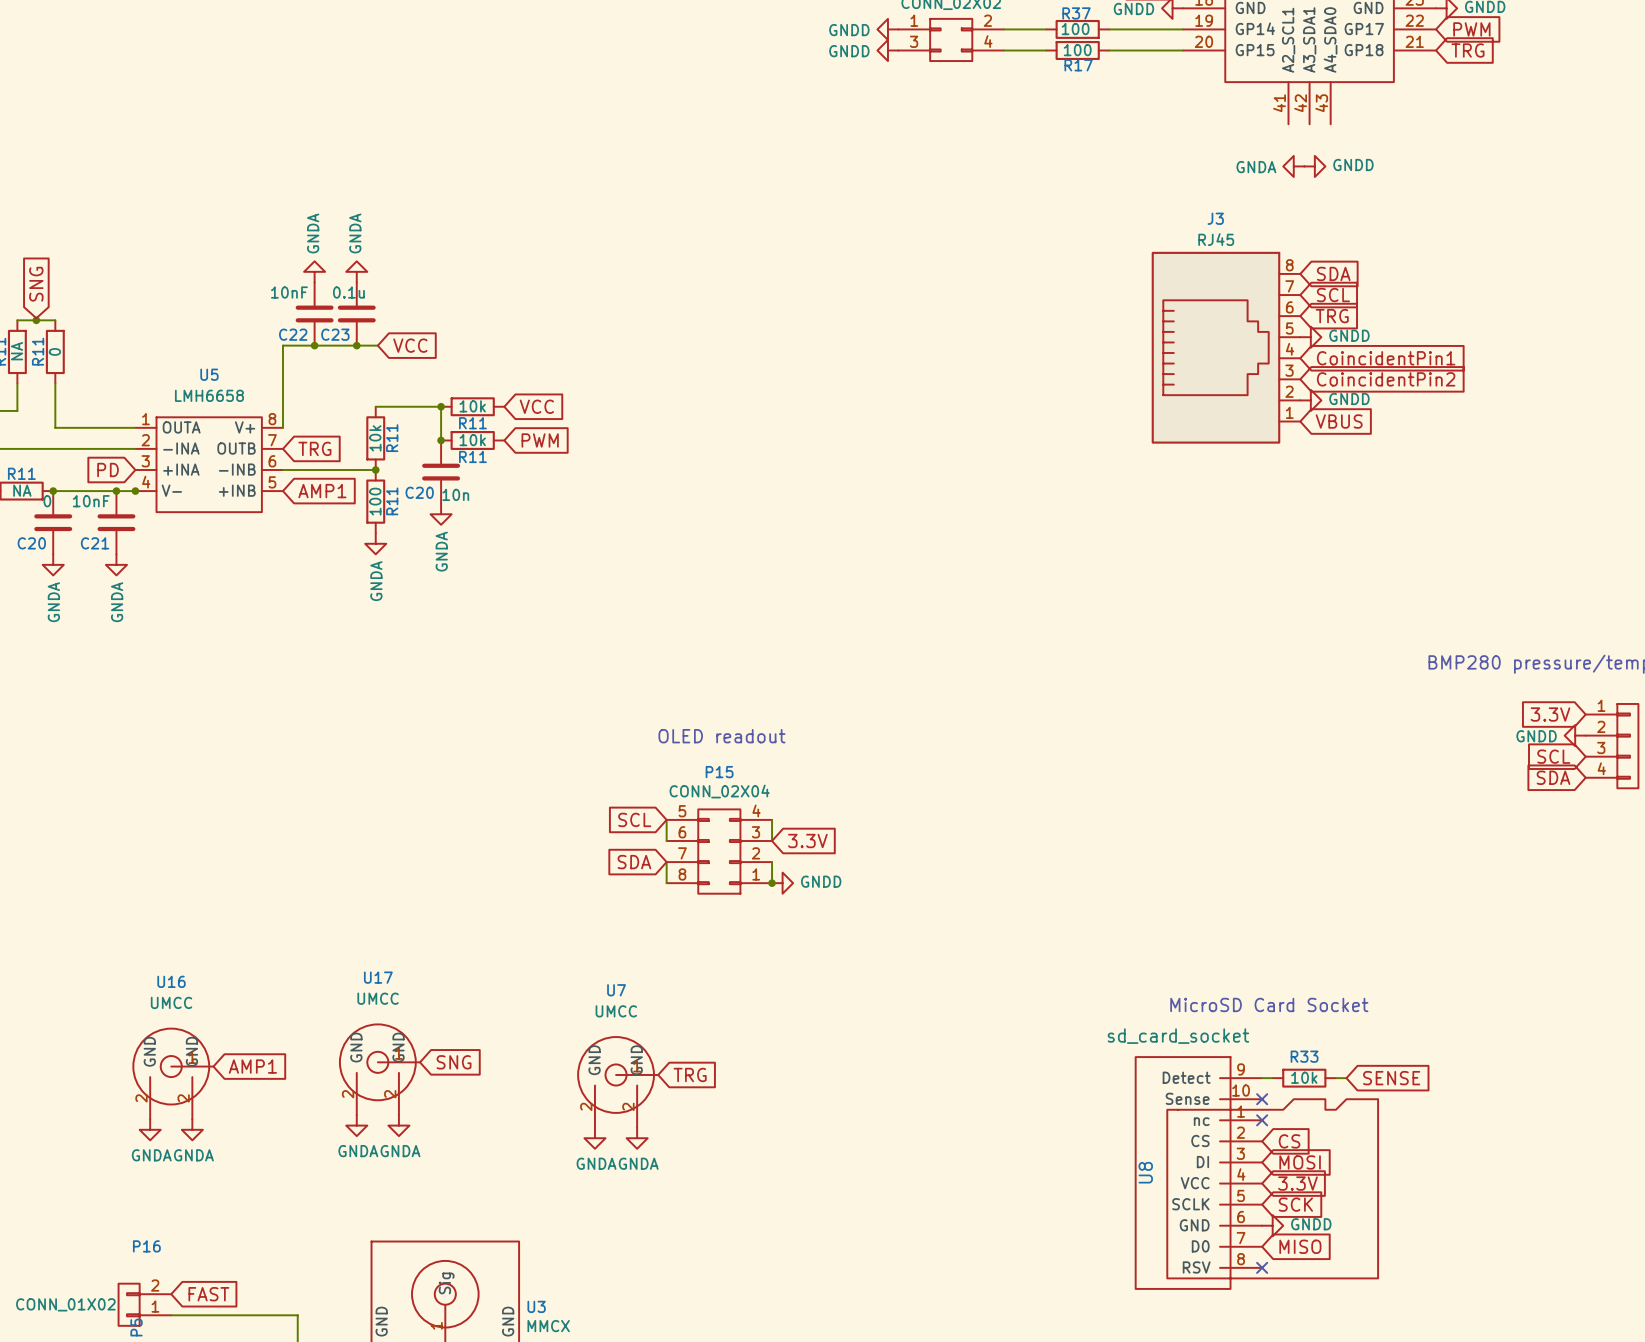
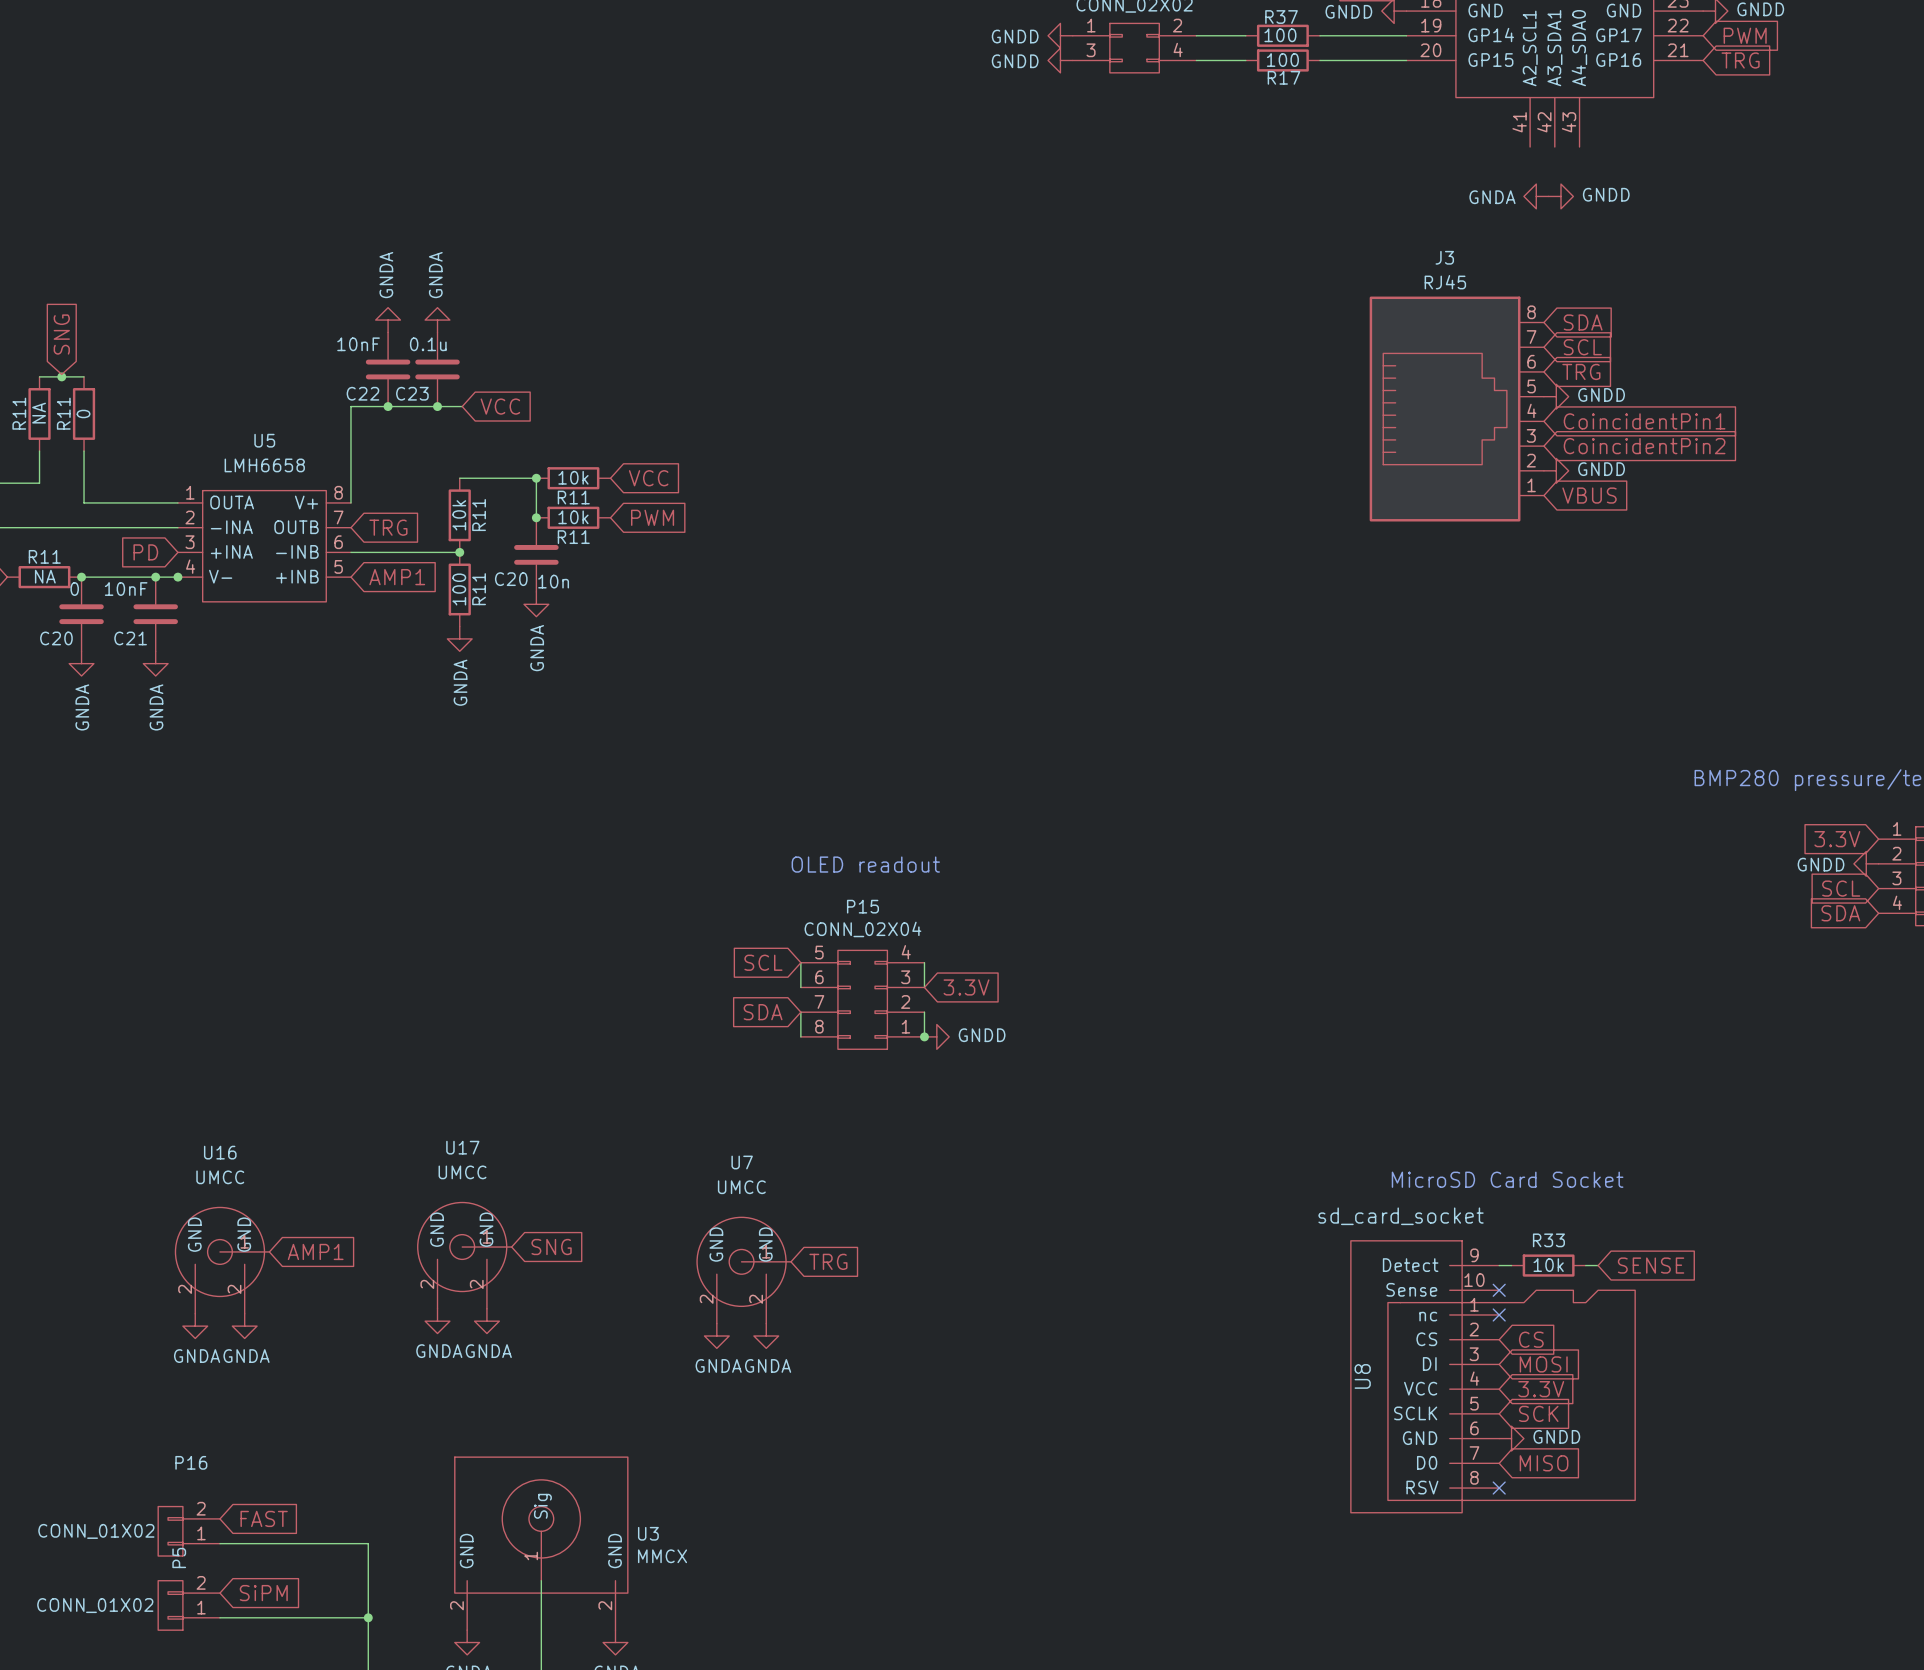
part pin name: GP18 (1364, 50) -> GP16 (1618, 60)

